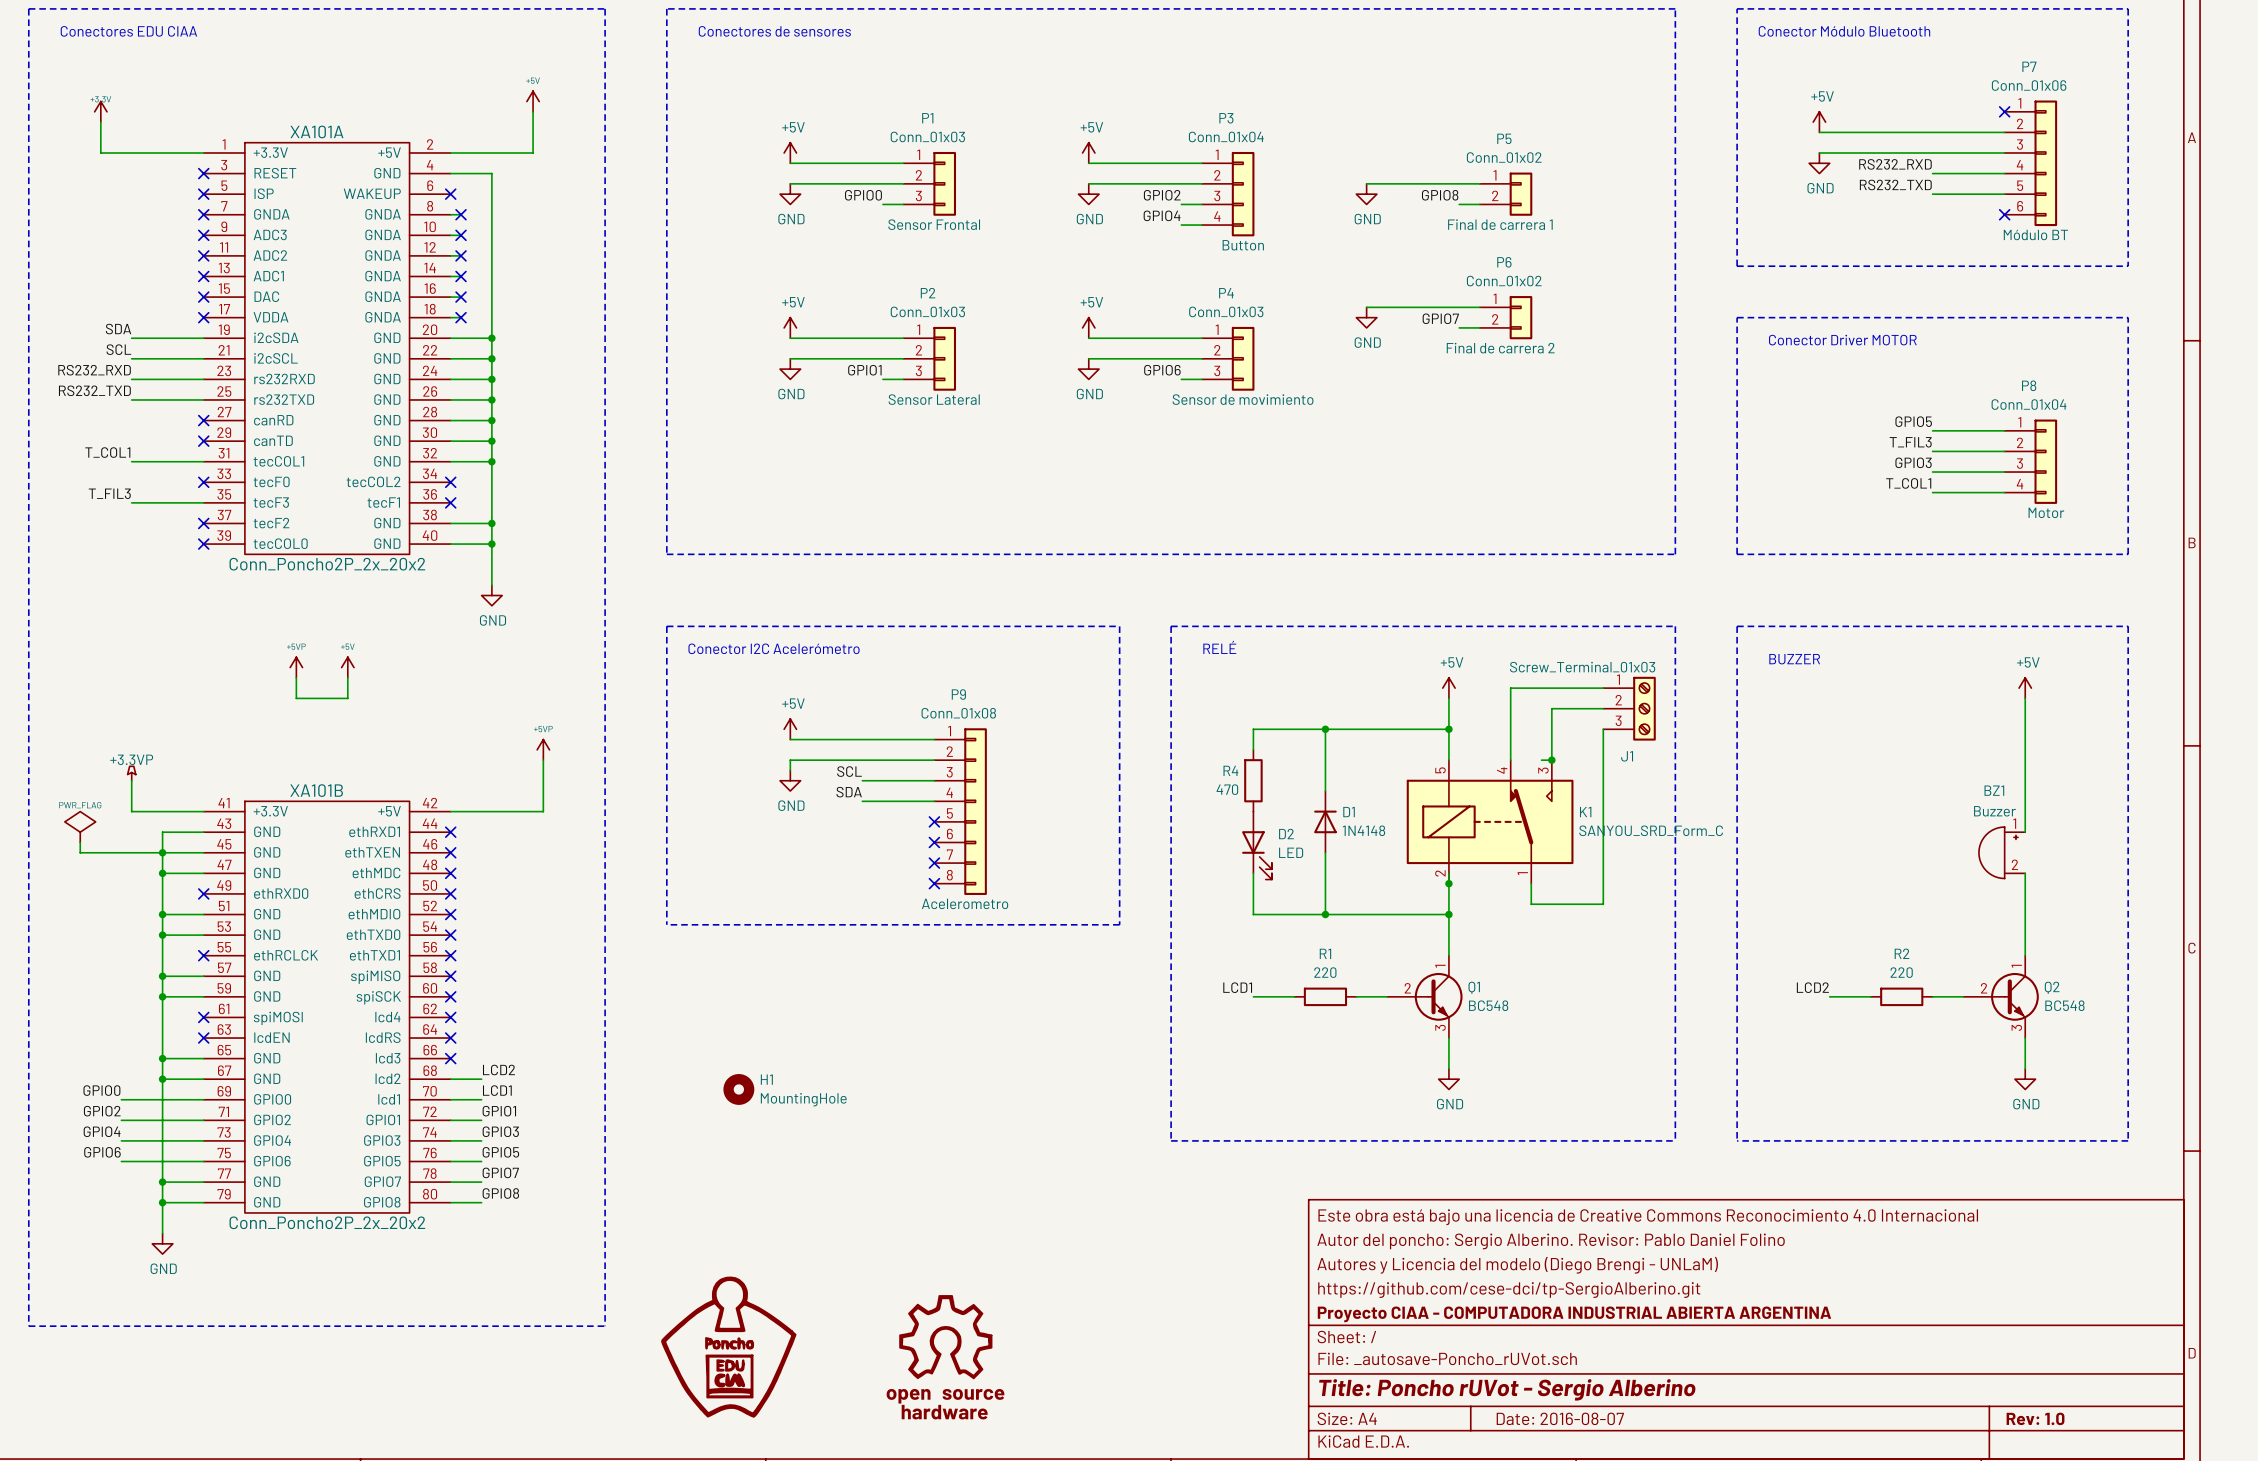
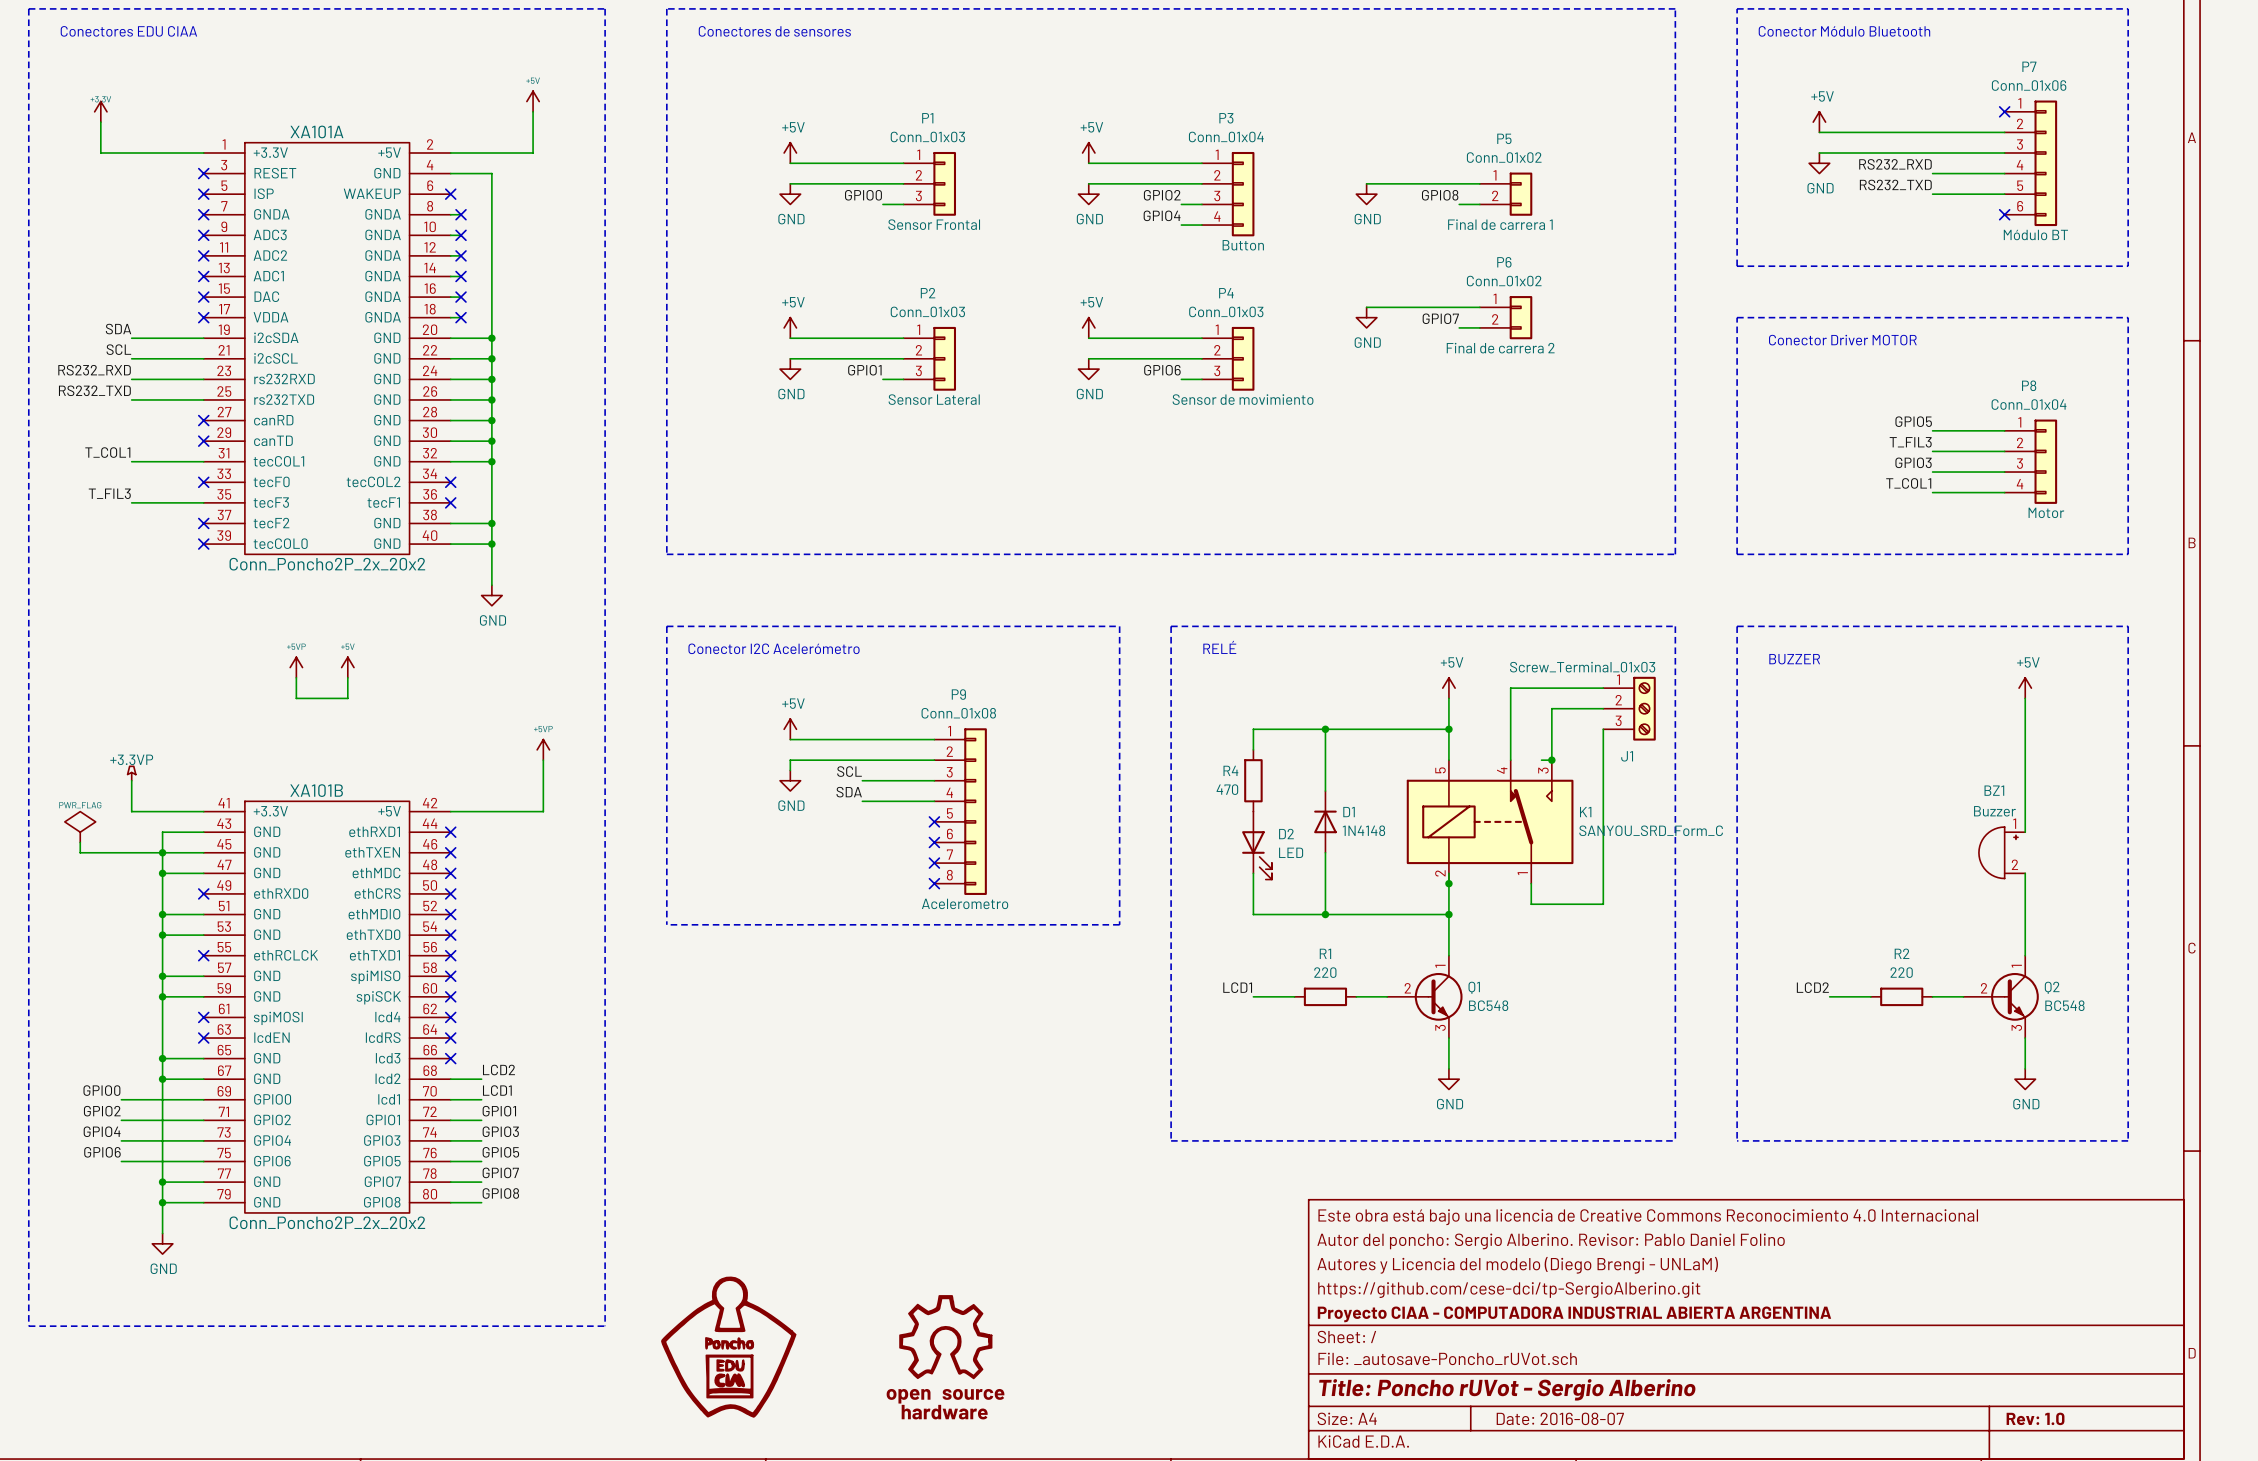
H1: MountingHole (738, 1089) -> none

